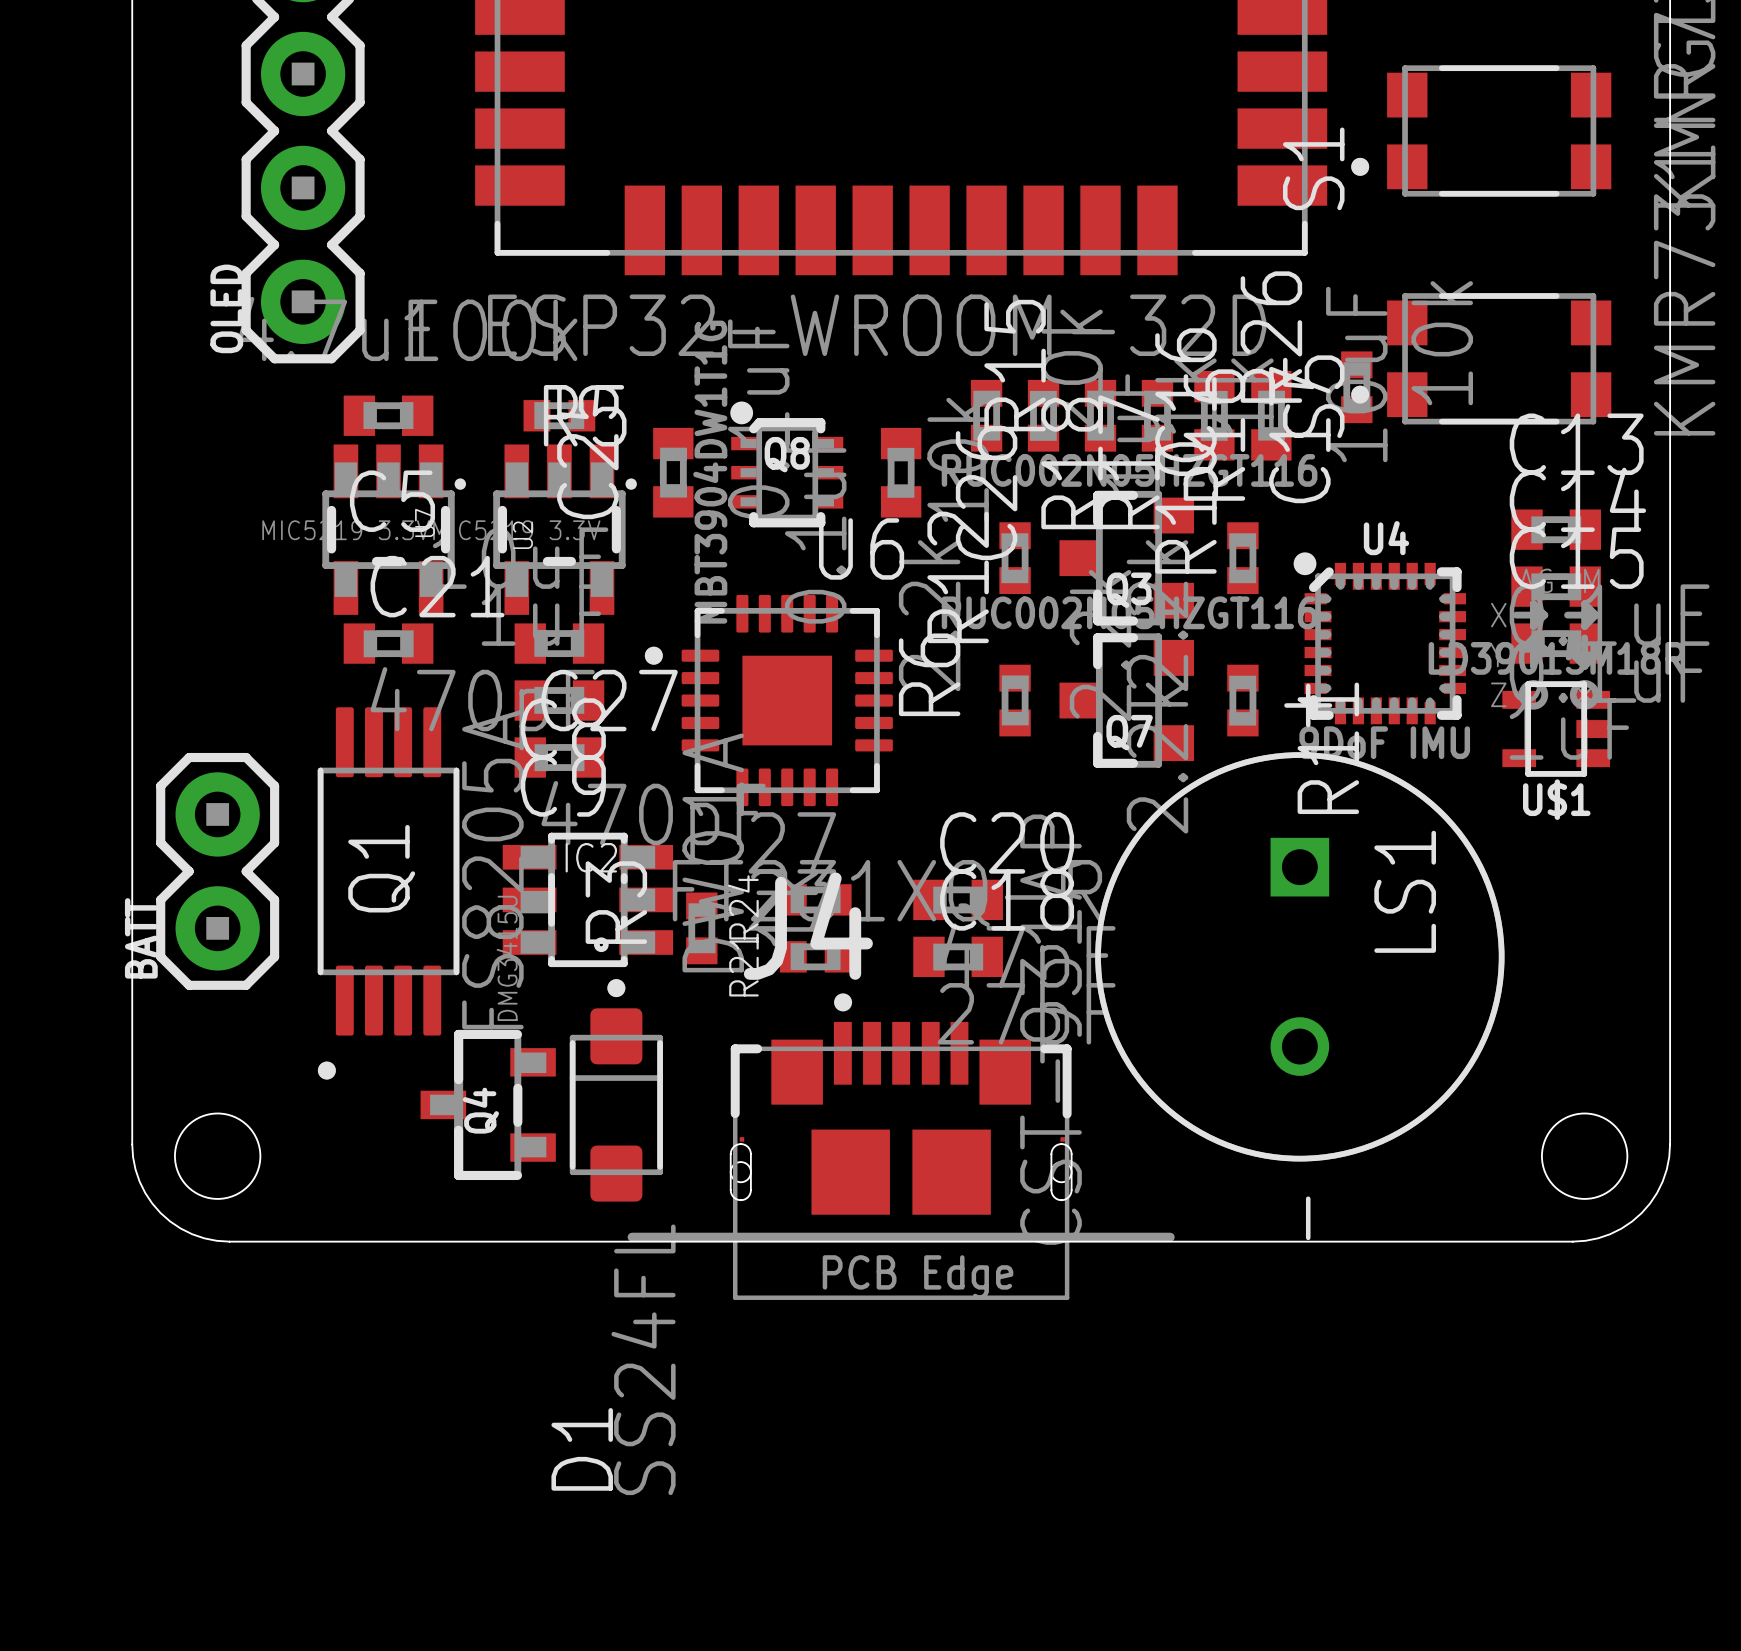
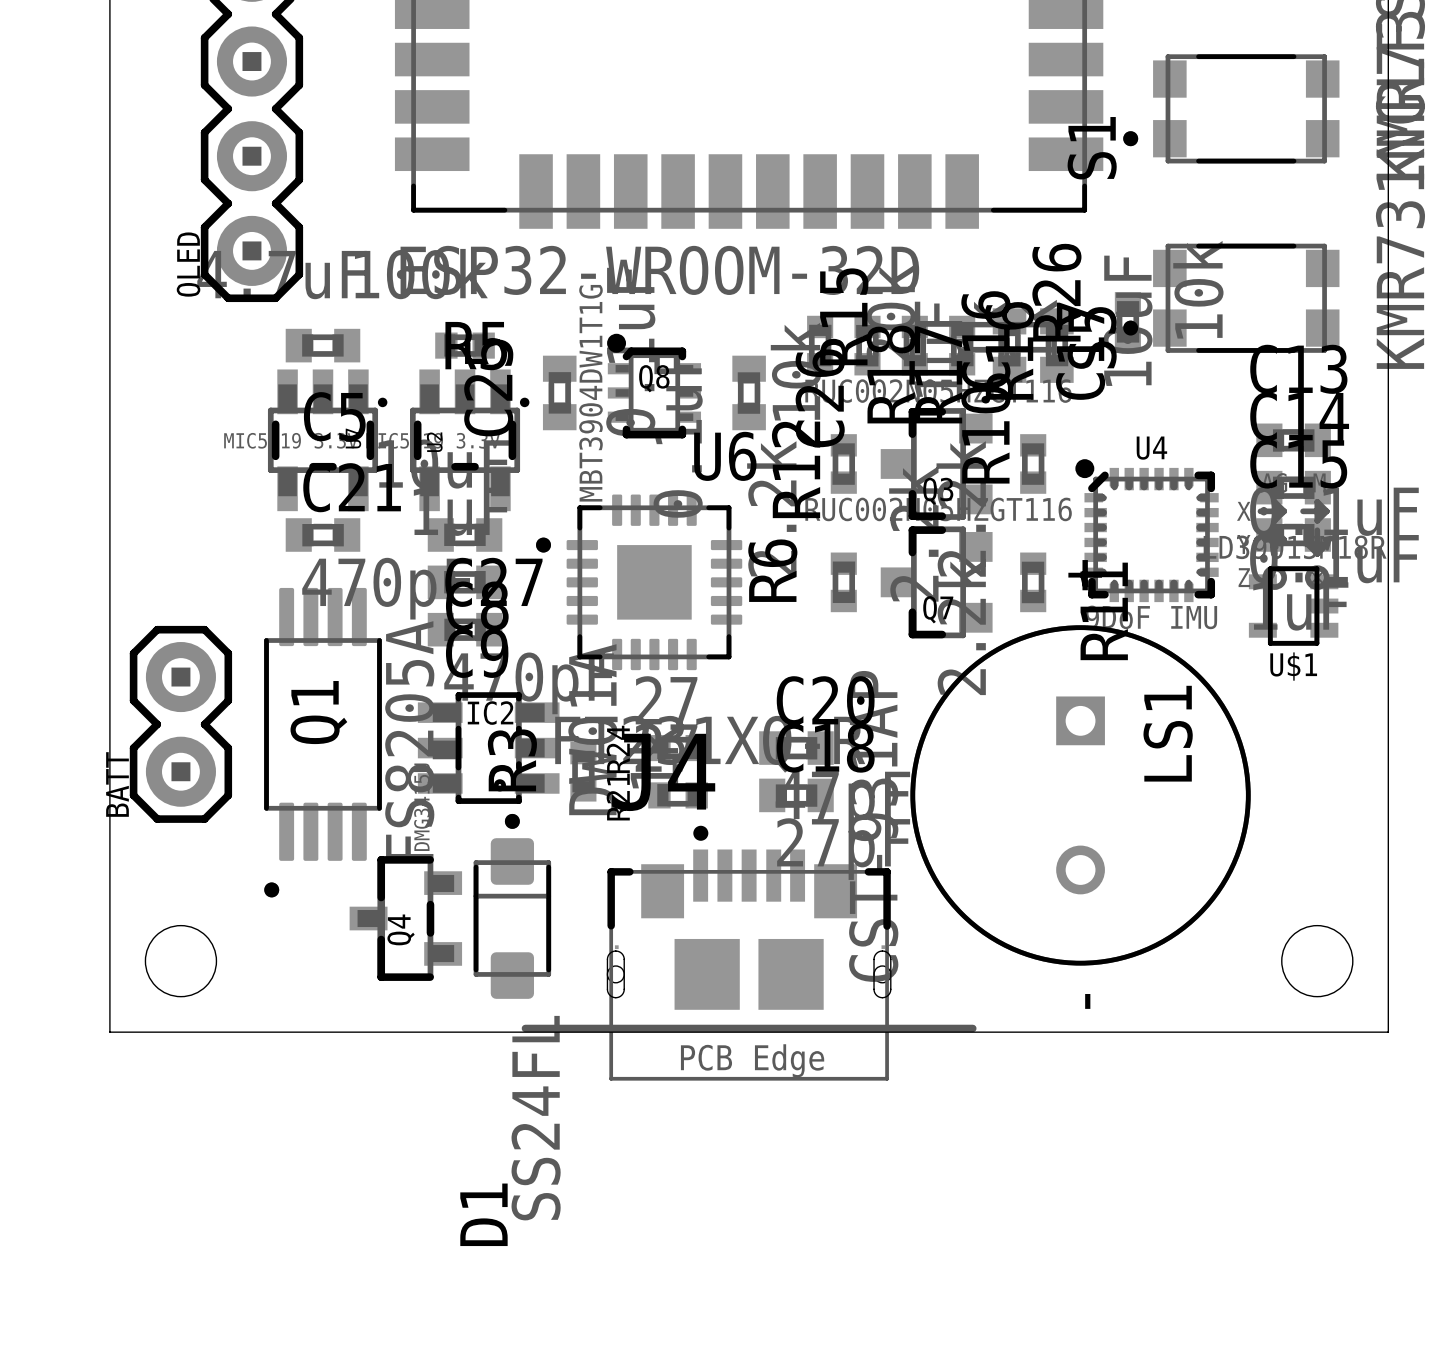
board edge: (132, 1144) (133, 1157) (139, 1181) (152, 1203) (160, 1213) (170, 1221) (192, 1234) (216, 1240) (229, 1241) -> (109, 951) (109, 1032) (190, 1032)
board edge: (1670, 1144) (1669, 1157) (1662, 1181) (1650, 1203) (1641, 1213) (1632, 1221) (1610, 1234) (1585, 1240) (1572, 1241) -> (1388, 951) (1388, 1032) (1307, 1032)

